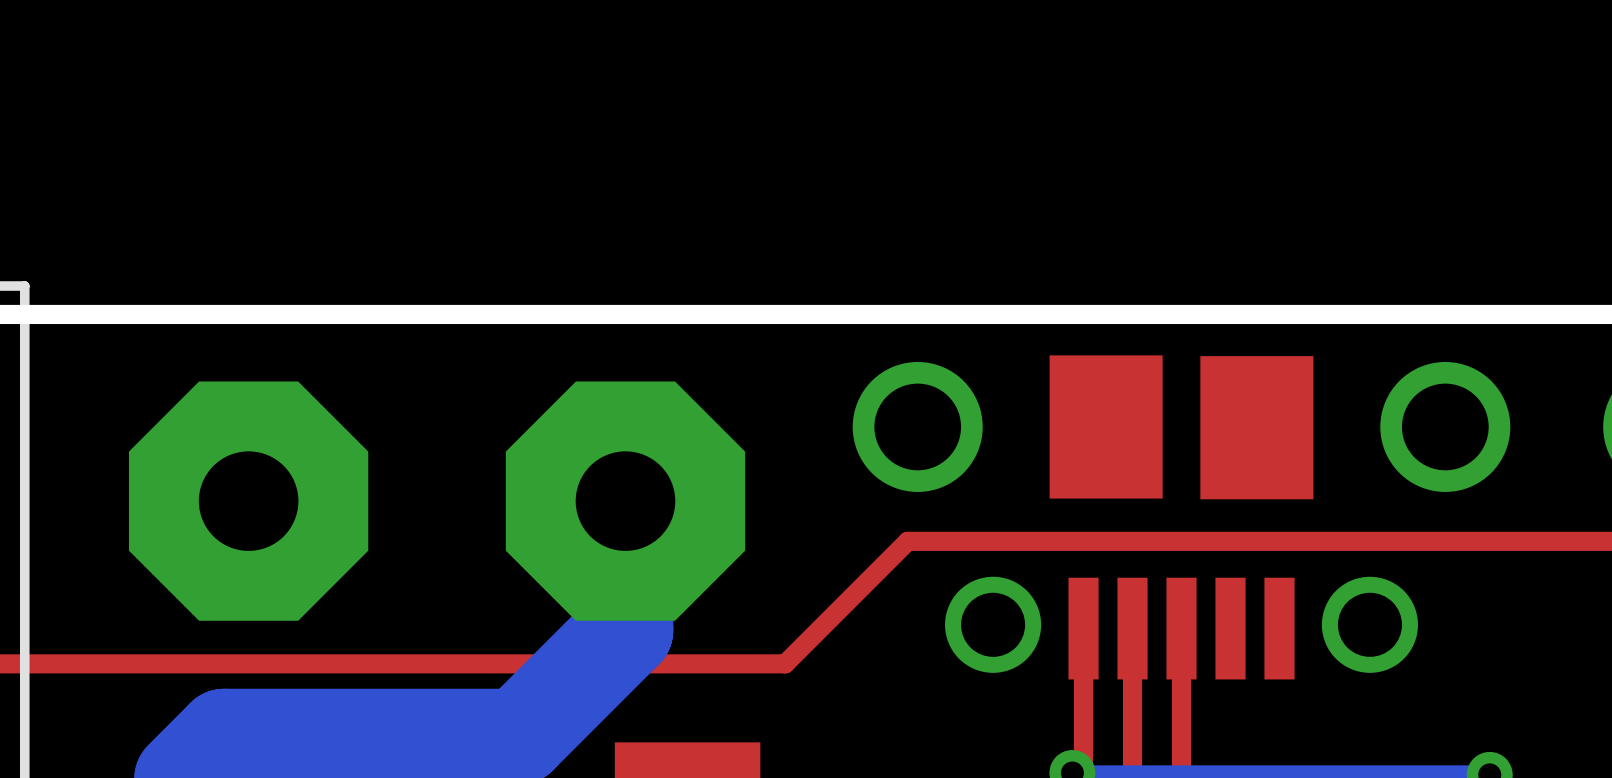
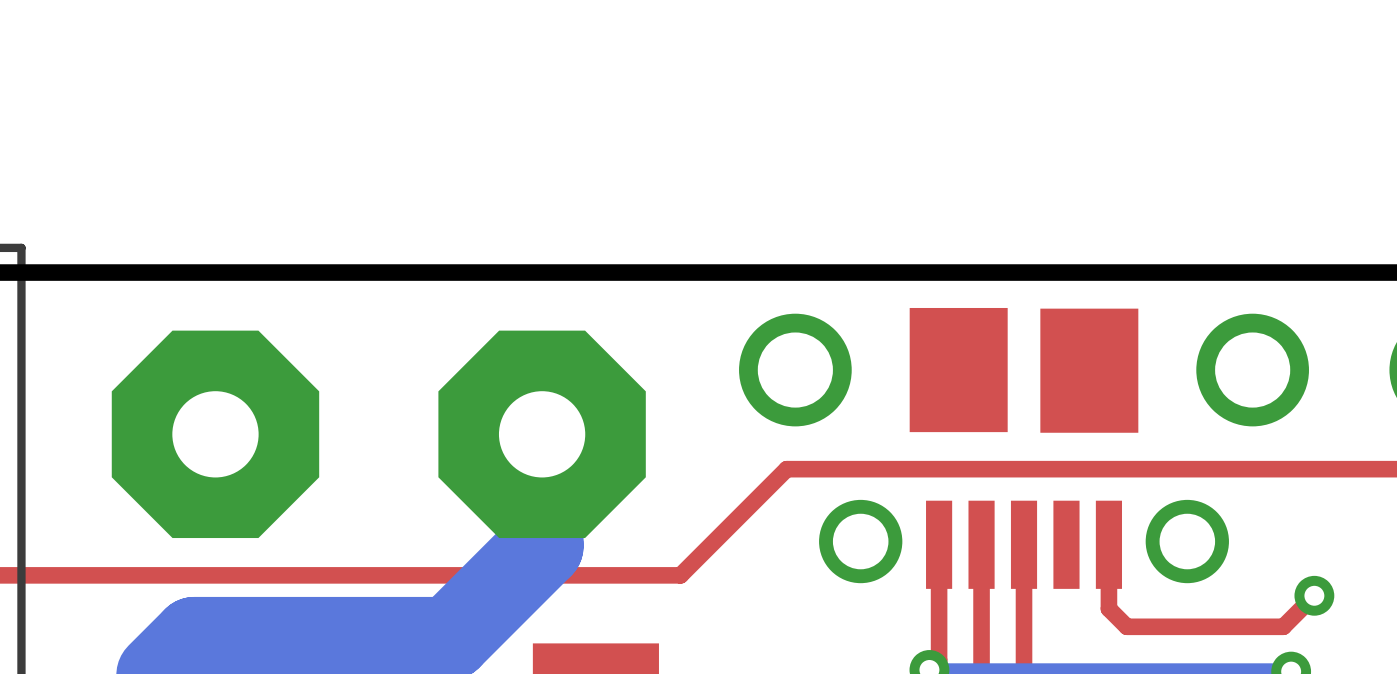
top track: none -> (1108, 544) (1108, 608) (1126, 626) (1283, 626) (1314, 595)
via: none -> (1314, 595)

